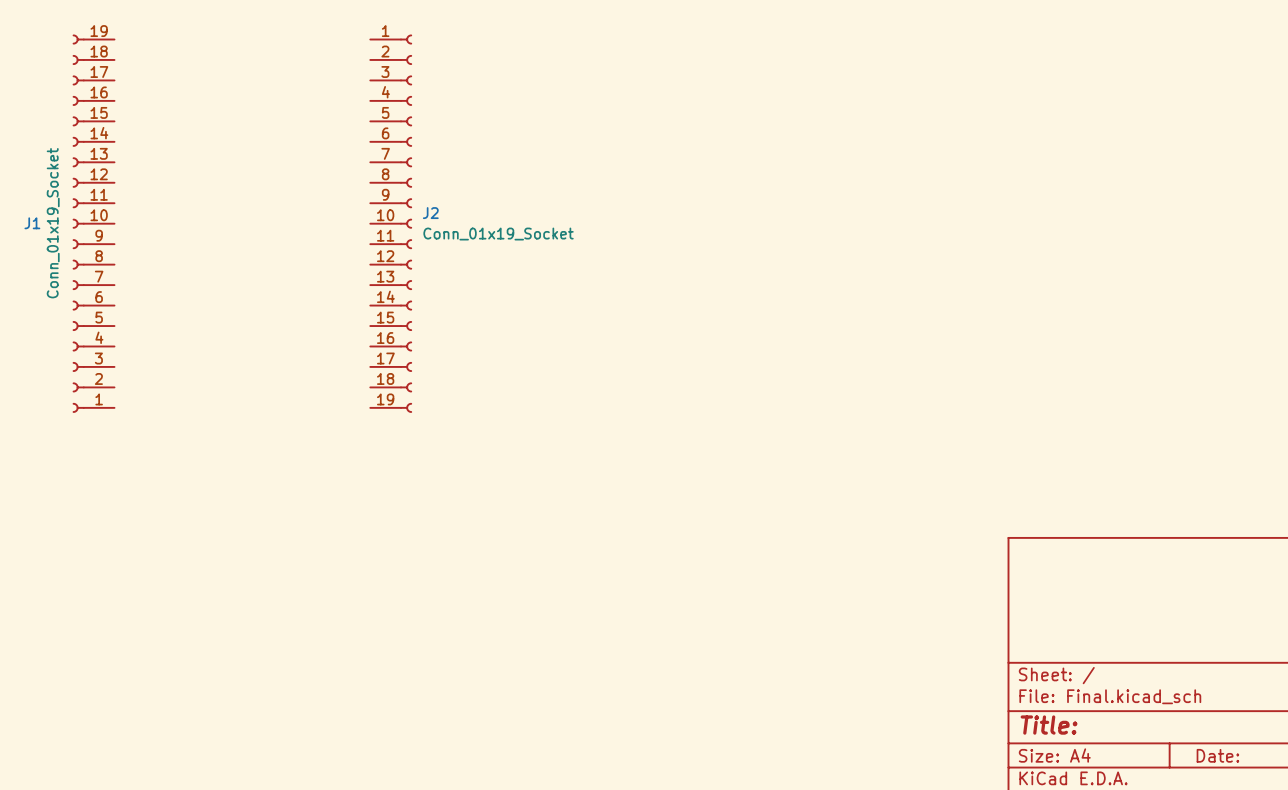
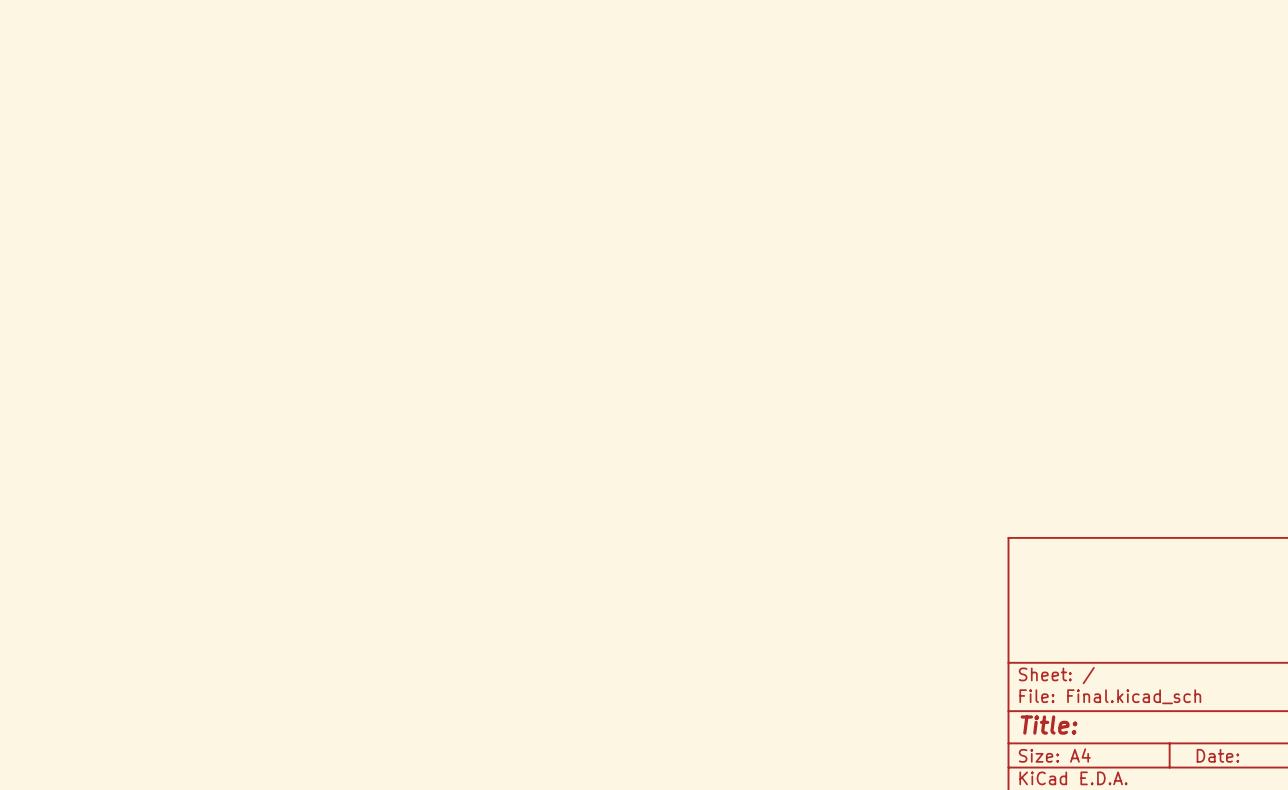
J1: Conn_01x19_Socket (93, 223) -> none
J2: Conn_01x19_Socket (391, 223) -> none

